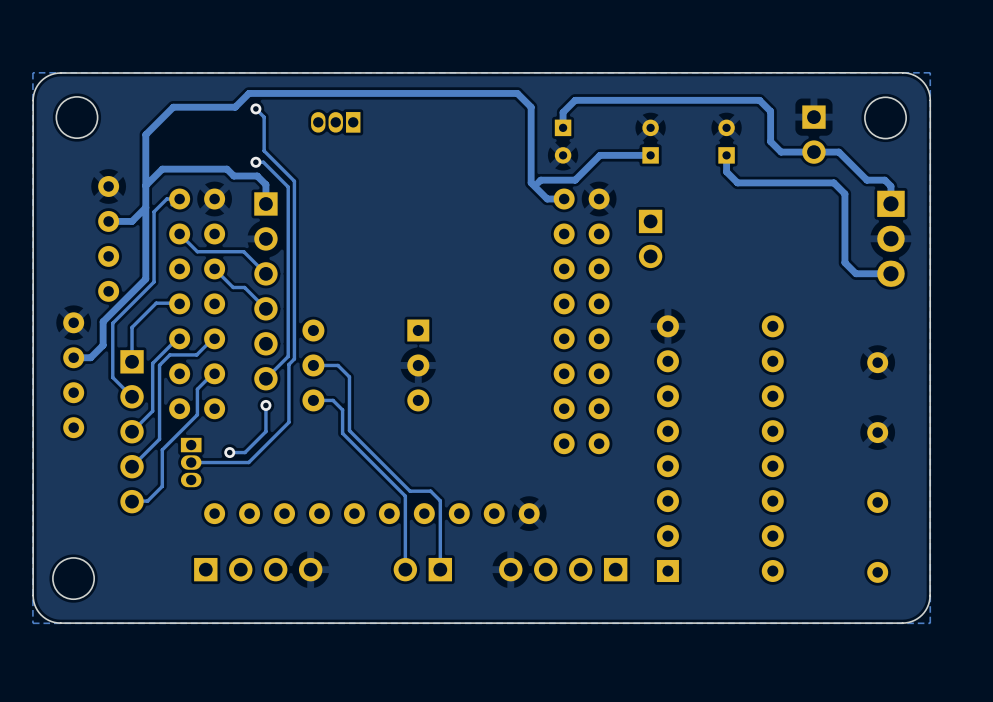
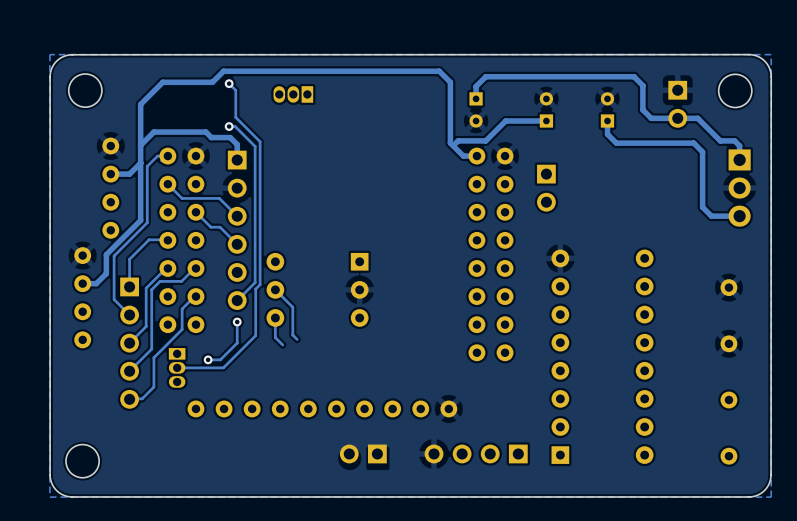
track: (313, 365) (337, 365) (349, 376) (349, 430) (410, 491) (430, 491) (440, 500) (440, 569) -> (275, 289) (292, 307) (292, 335) (297, 339)
track: (313, 400) (333, 400) (342, 409) (342, 433) (405, 496) (405, 569) -> (275, 317) (275, 337) (282, 345)
part: (258, 569) -> none

